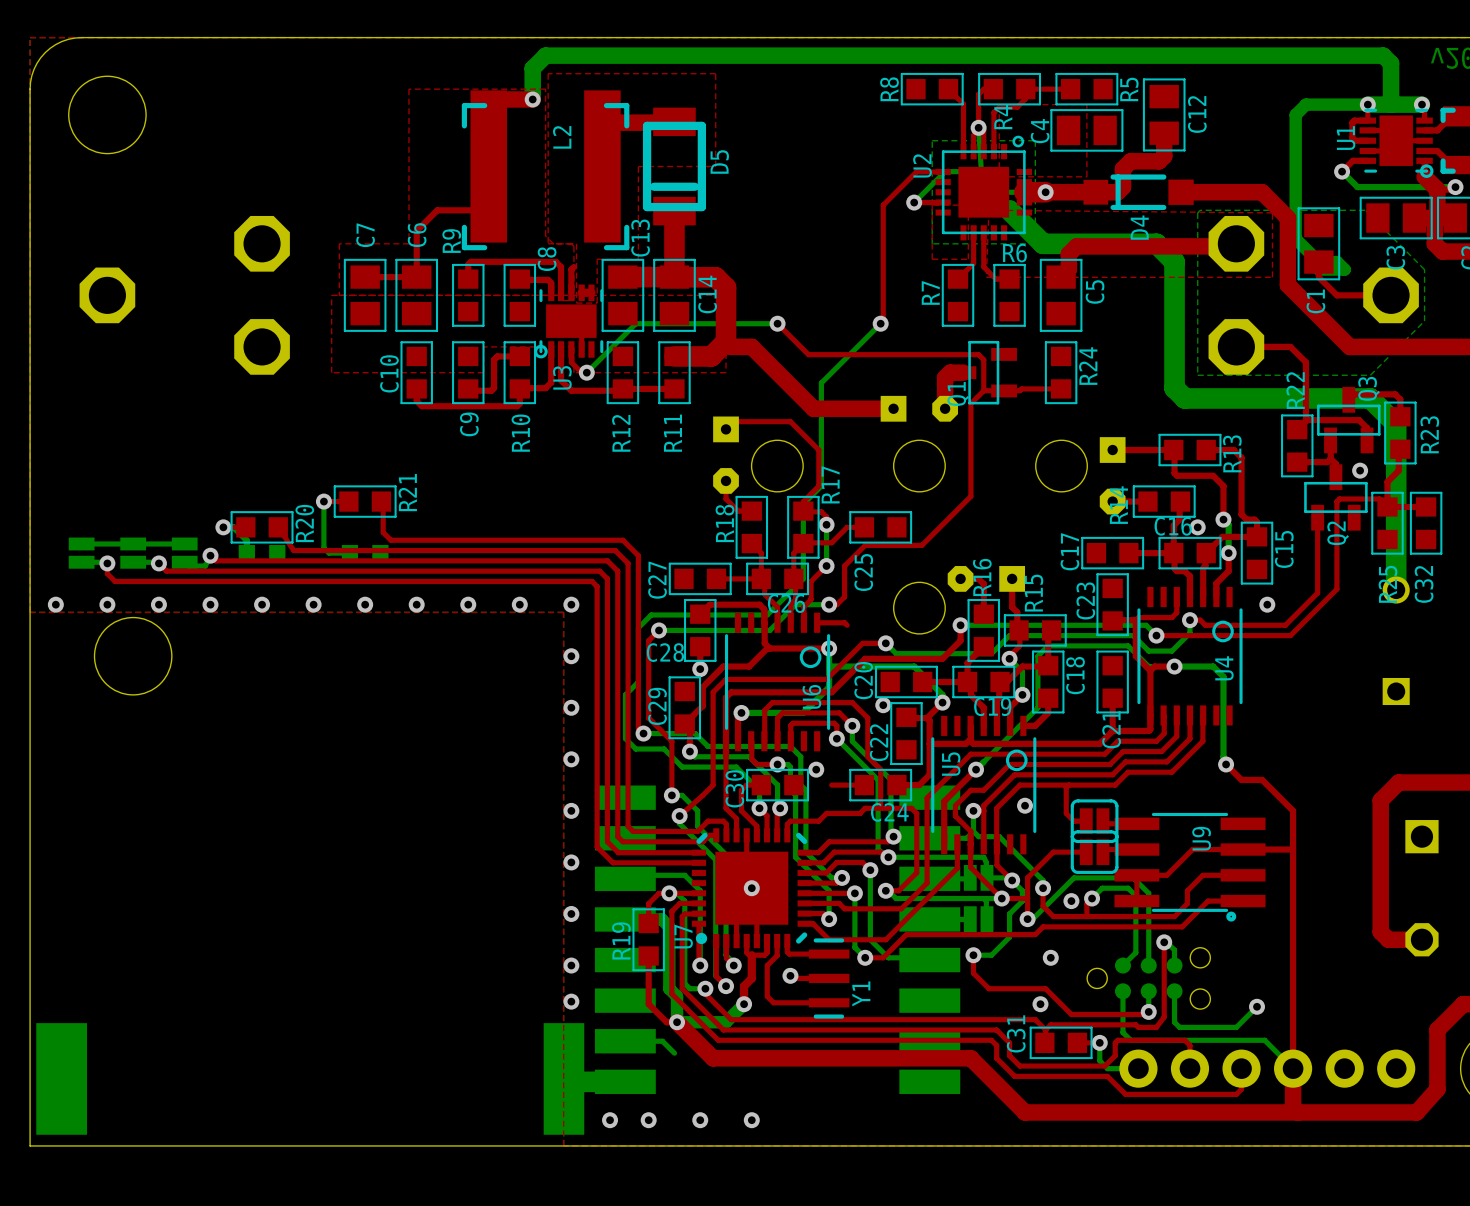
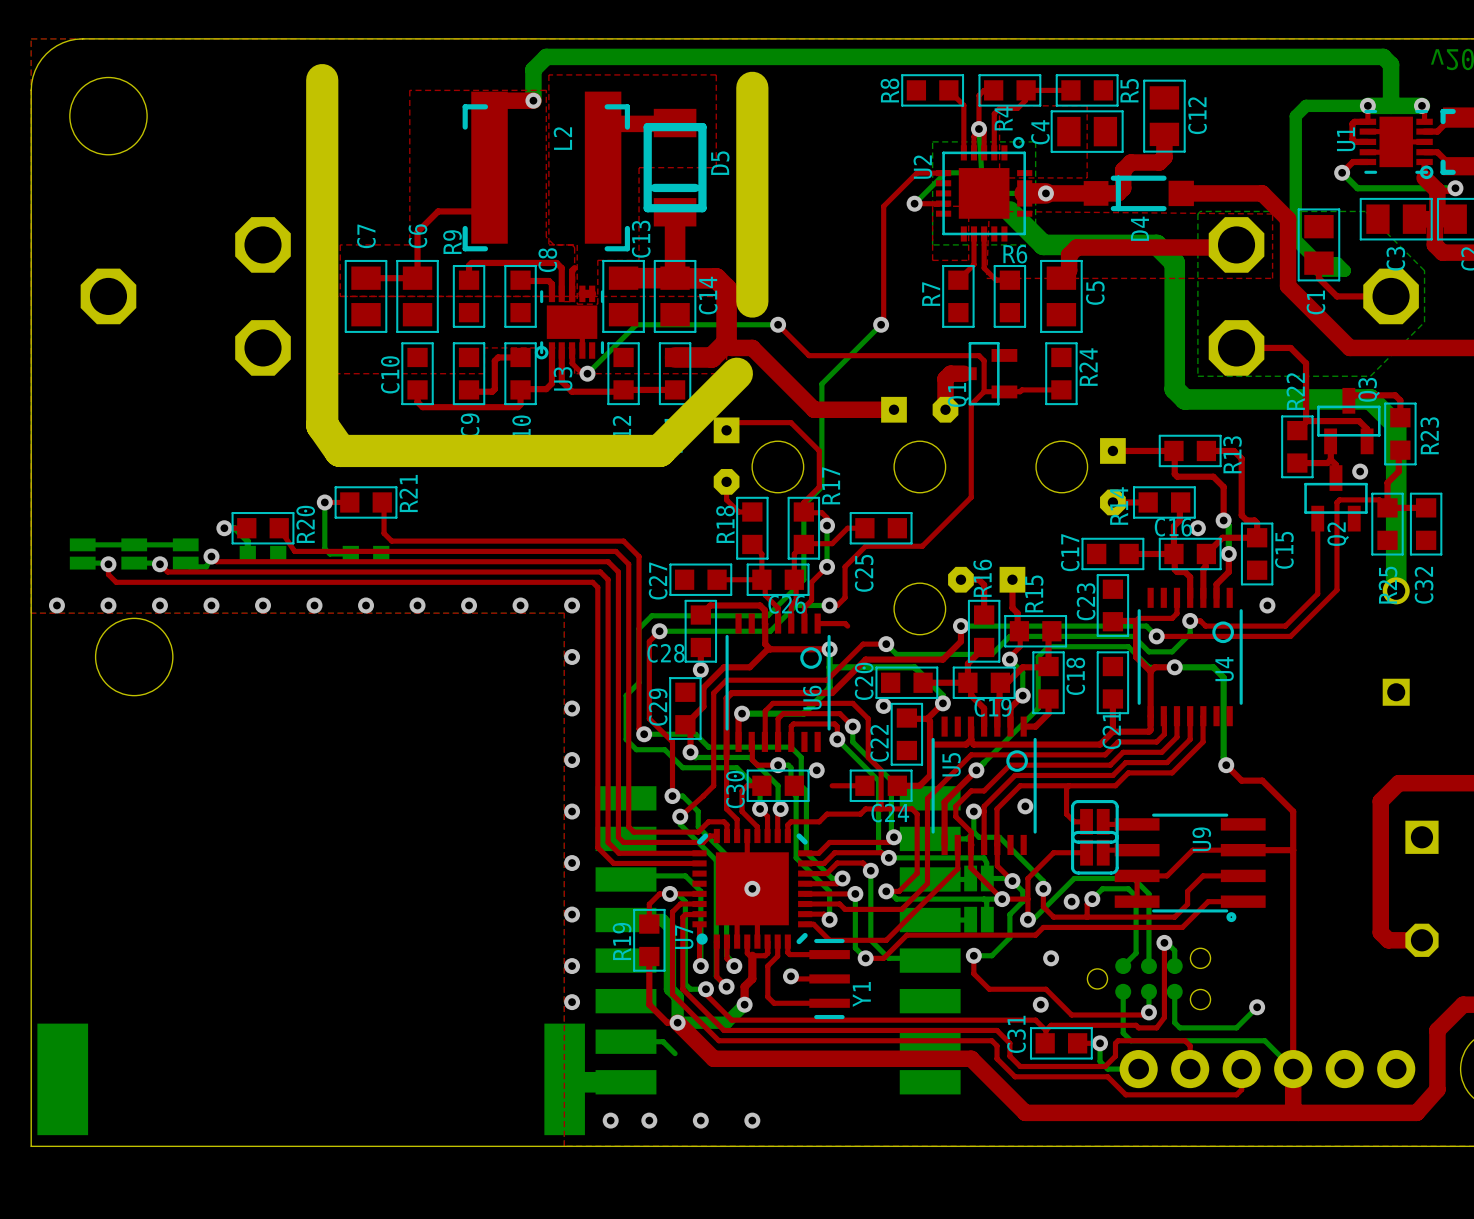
board edge: none -> (322, 80) (322, 425) (340, 450) (659, 450) (736, 373)
board edge: none -> (752, 87) (752, 301)

